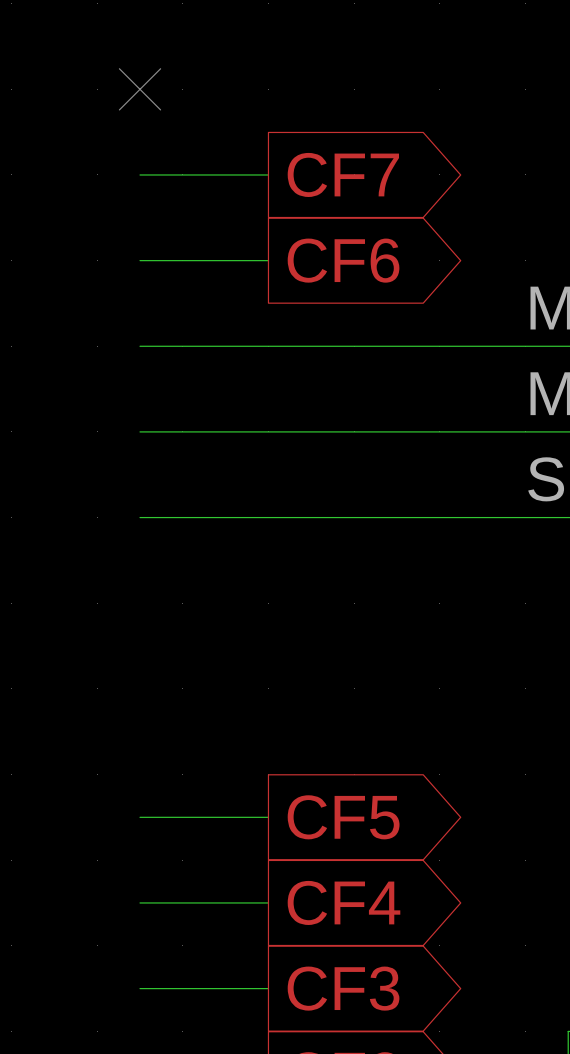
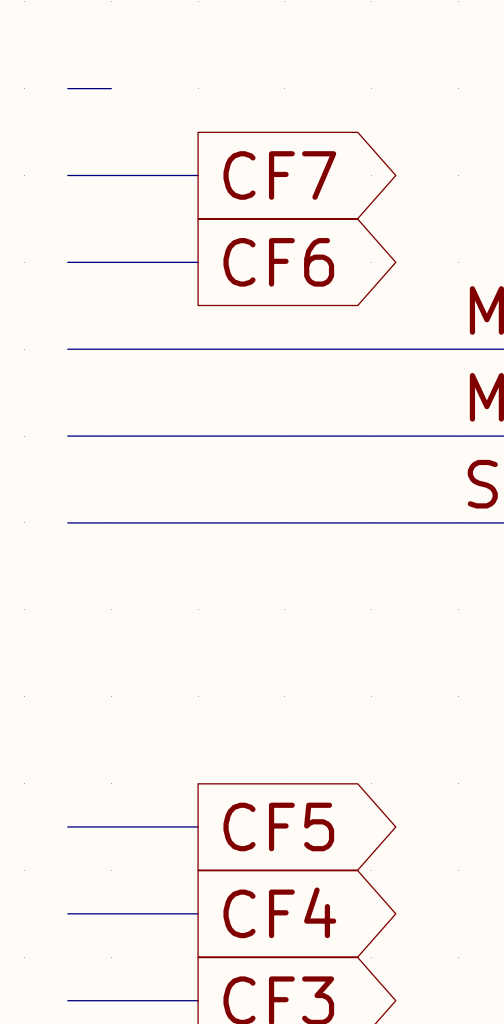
wire: none -> (67, 88) (111, 88)
no-connect mark: (140, 89) -> none

